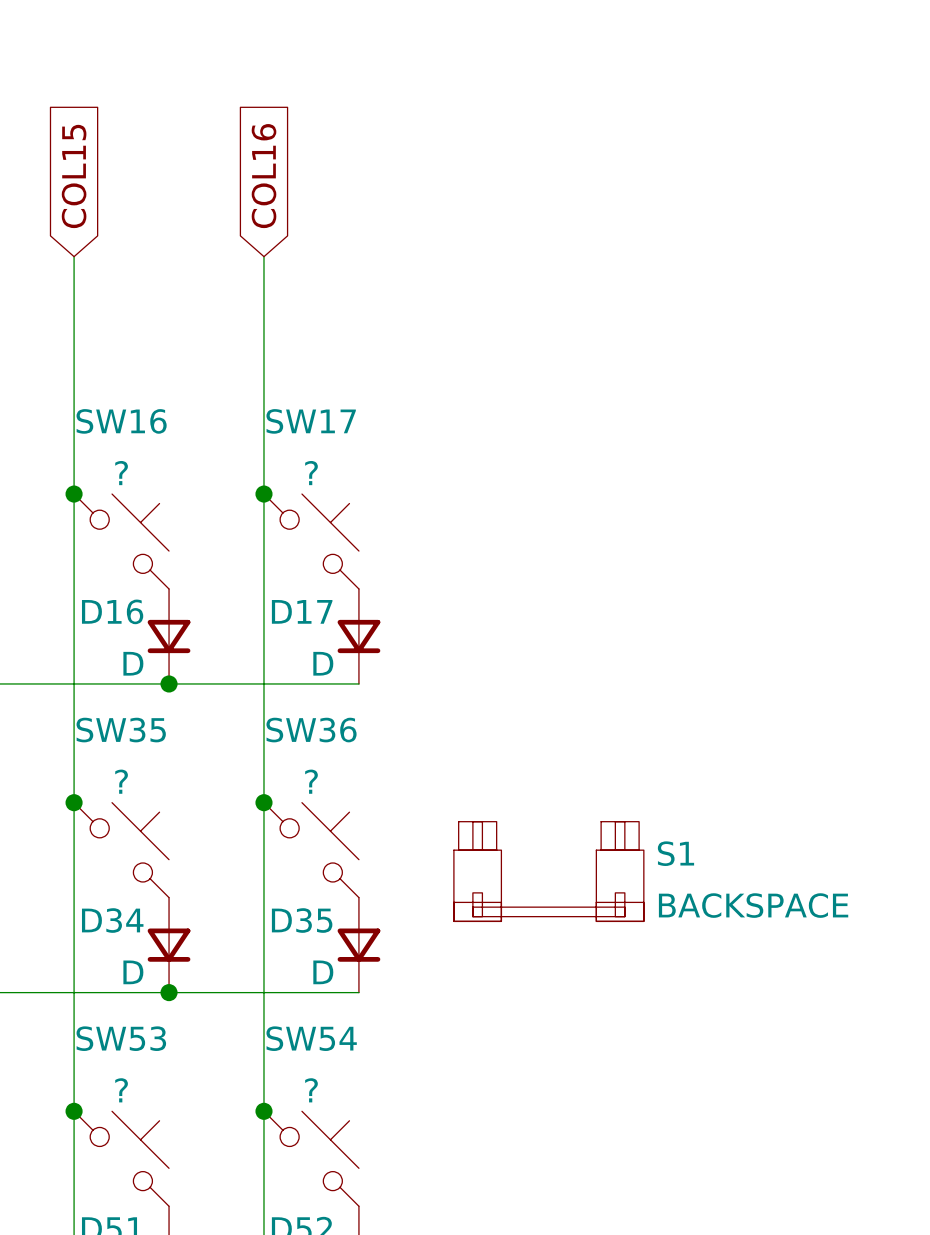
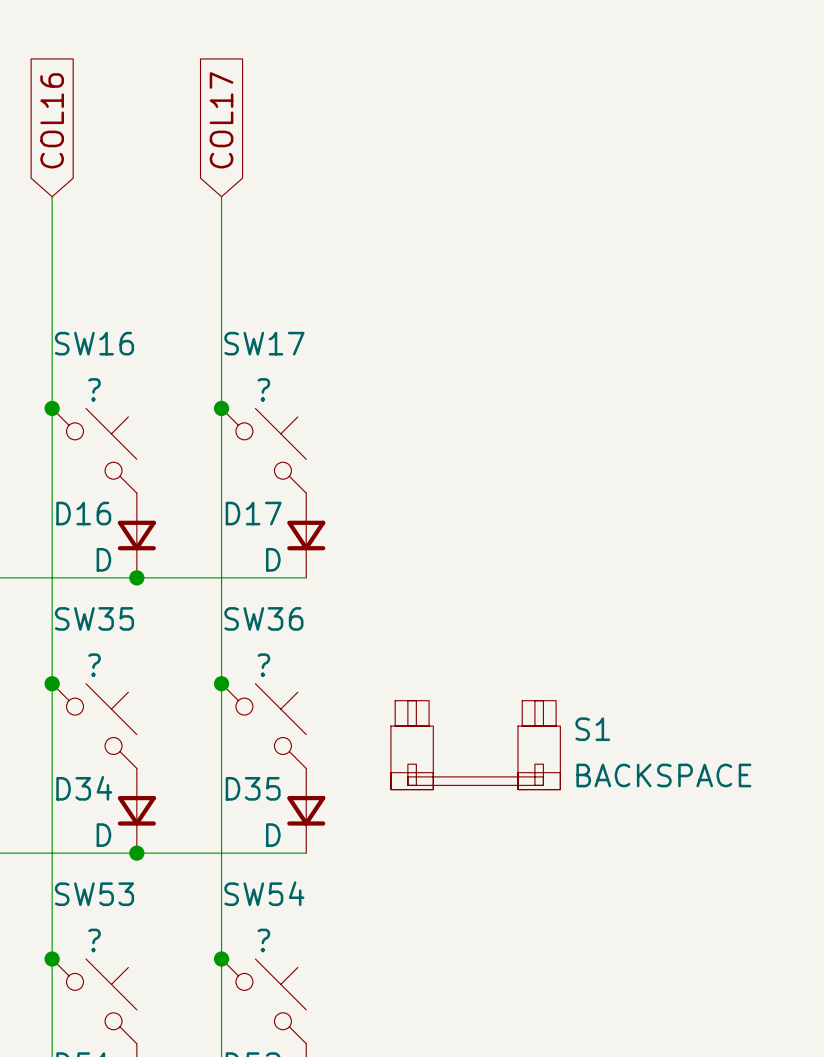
global label: COL15 (74, 176) -> COL16 (52, 120)
global label: COL16 (264, 176) -> COL17 (221, 120)

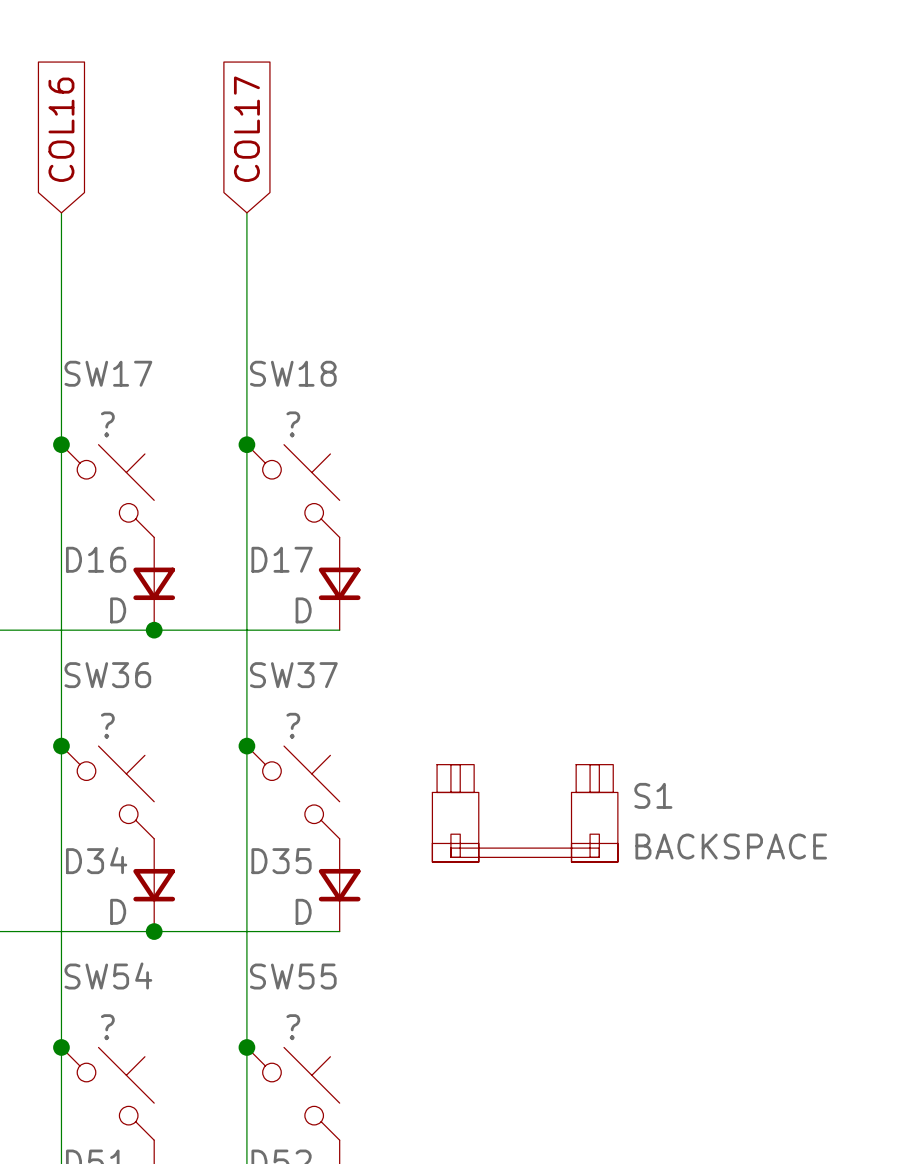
SW16 name: SW16 (94, 343) -> SW17 (108, 373)
SW17 name: SW17 (264, 343) -> SW18 (293, 373)
SW35 name: SW35 (94, 618) -> SW36 (107, 675)
SW36 name: SW36 (263, 618) -> SW37 (293, 675)
SW54 name: SW54 (264, 893) -> SW55 (293, 976)
SW53 name: SW53 (94, 894) -> SW54 (108, 975)

